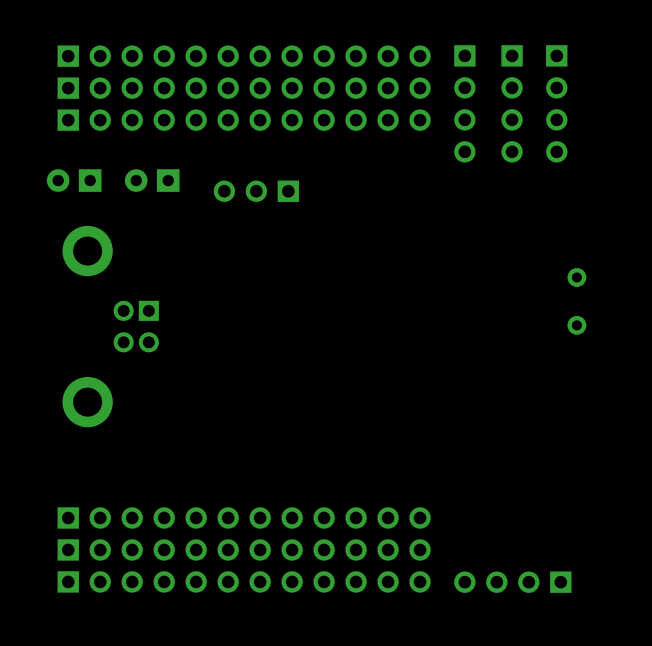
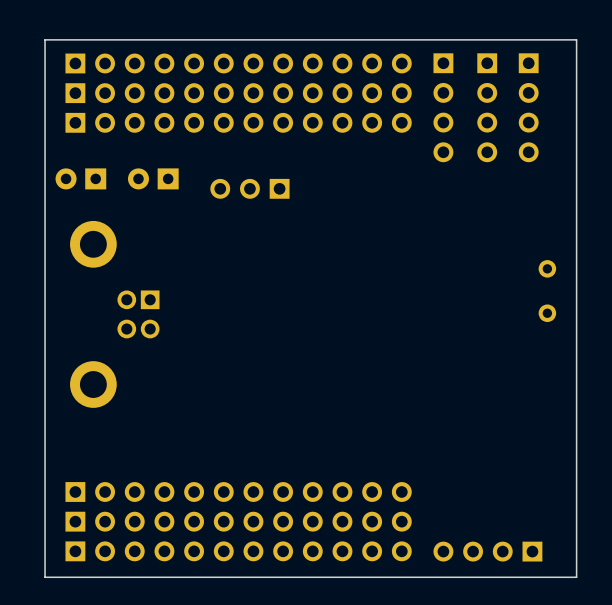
board edge: none -> (576, 39) (45, 39) (45, 577) (576, 577) (576, 39)

